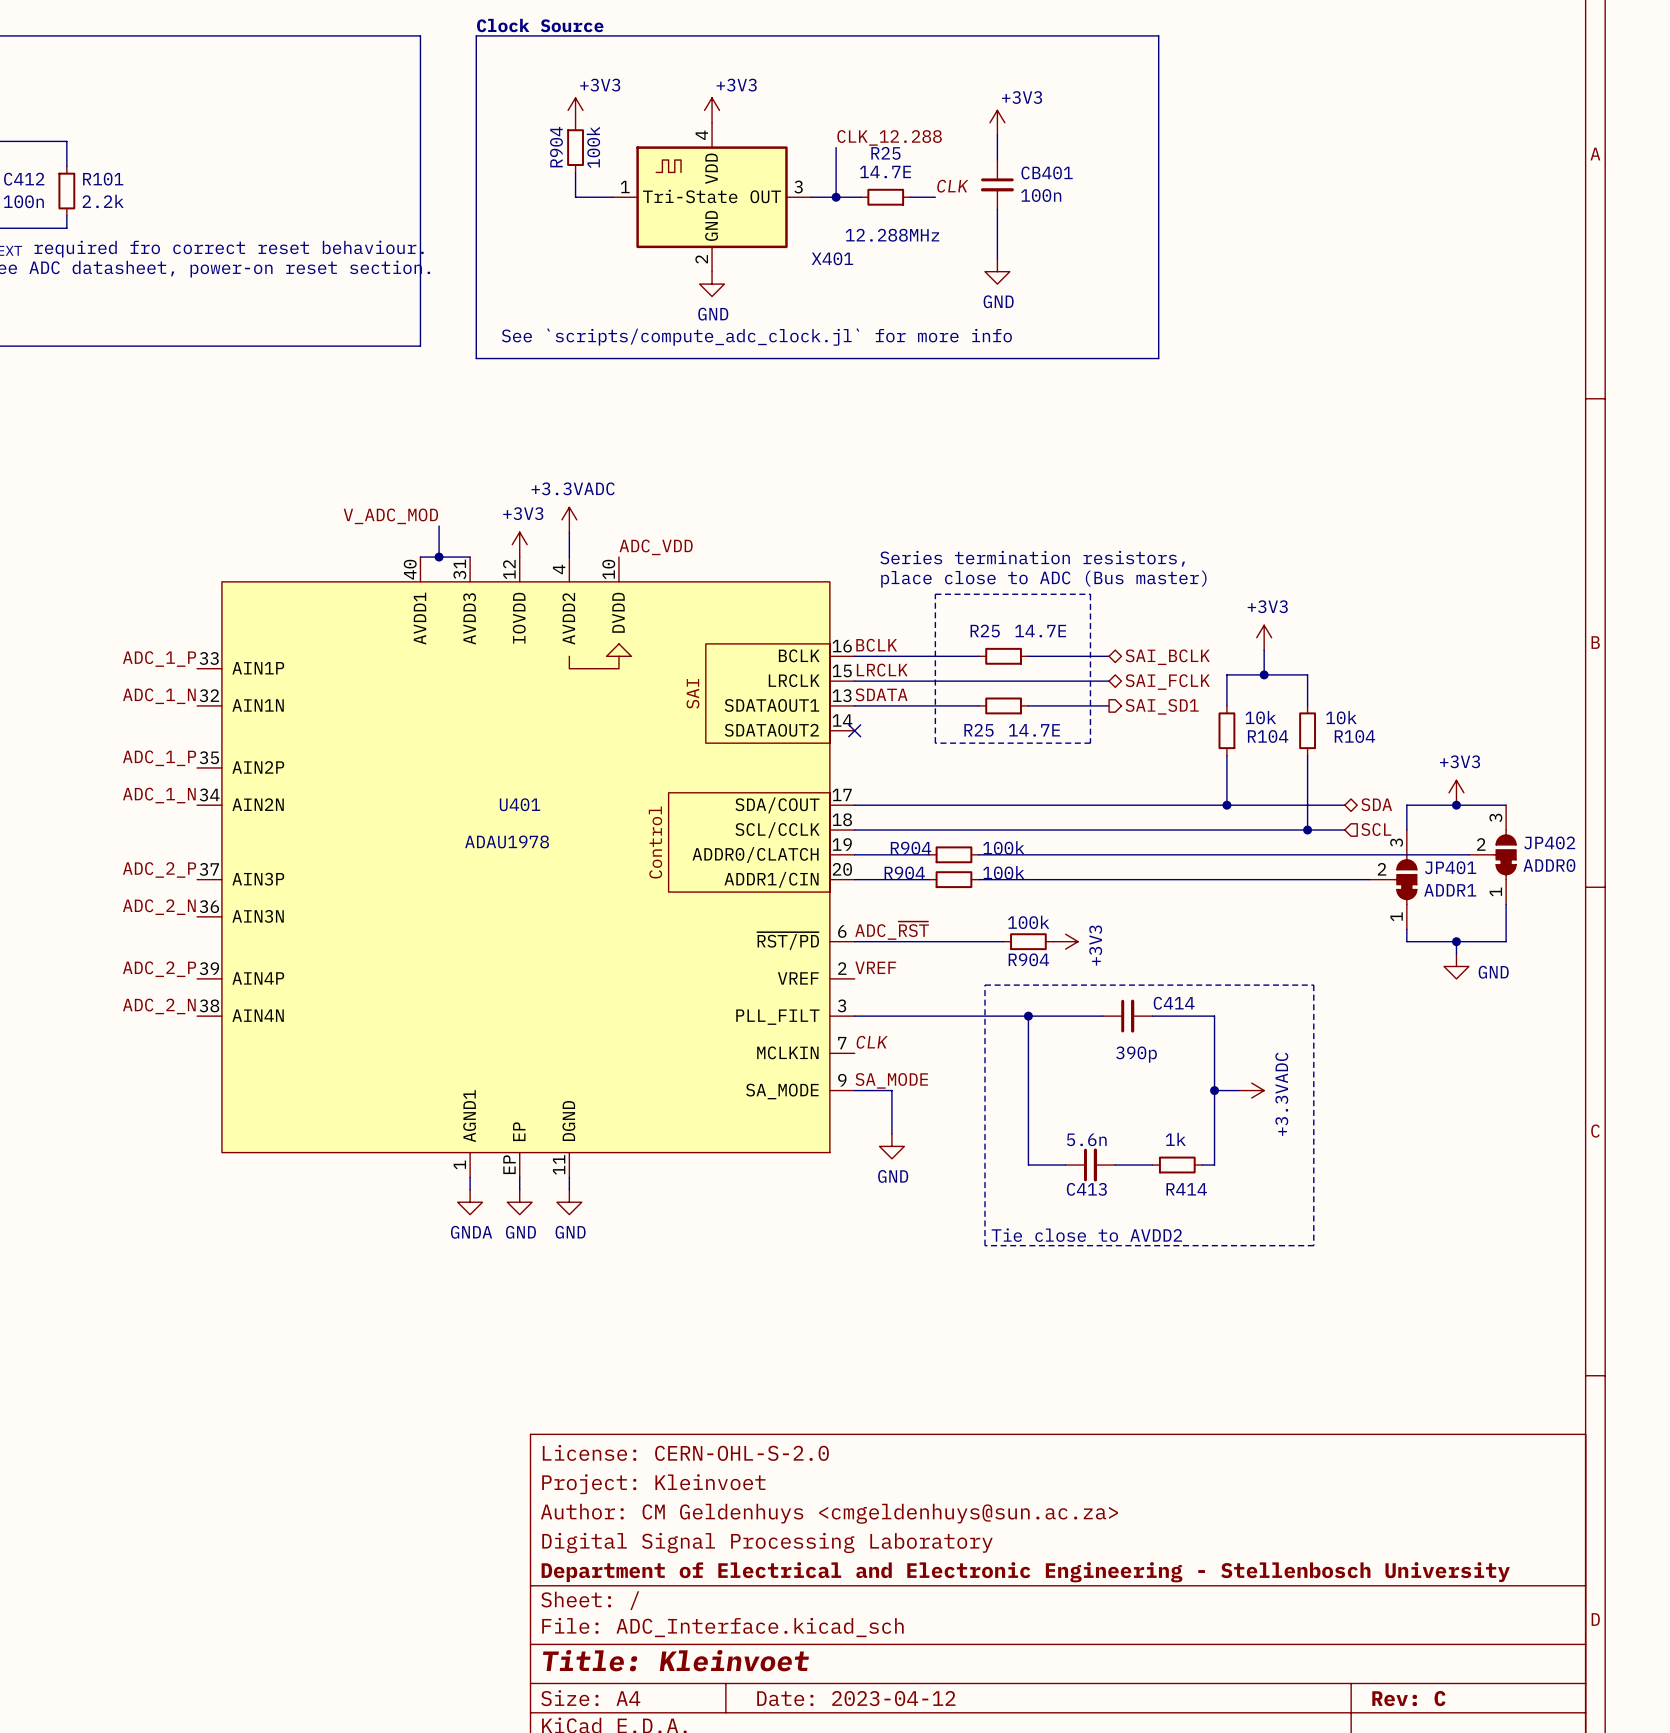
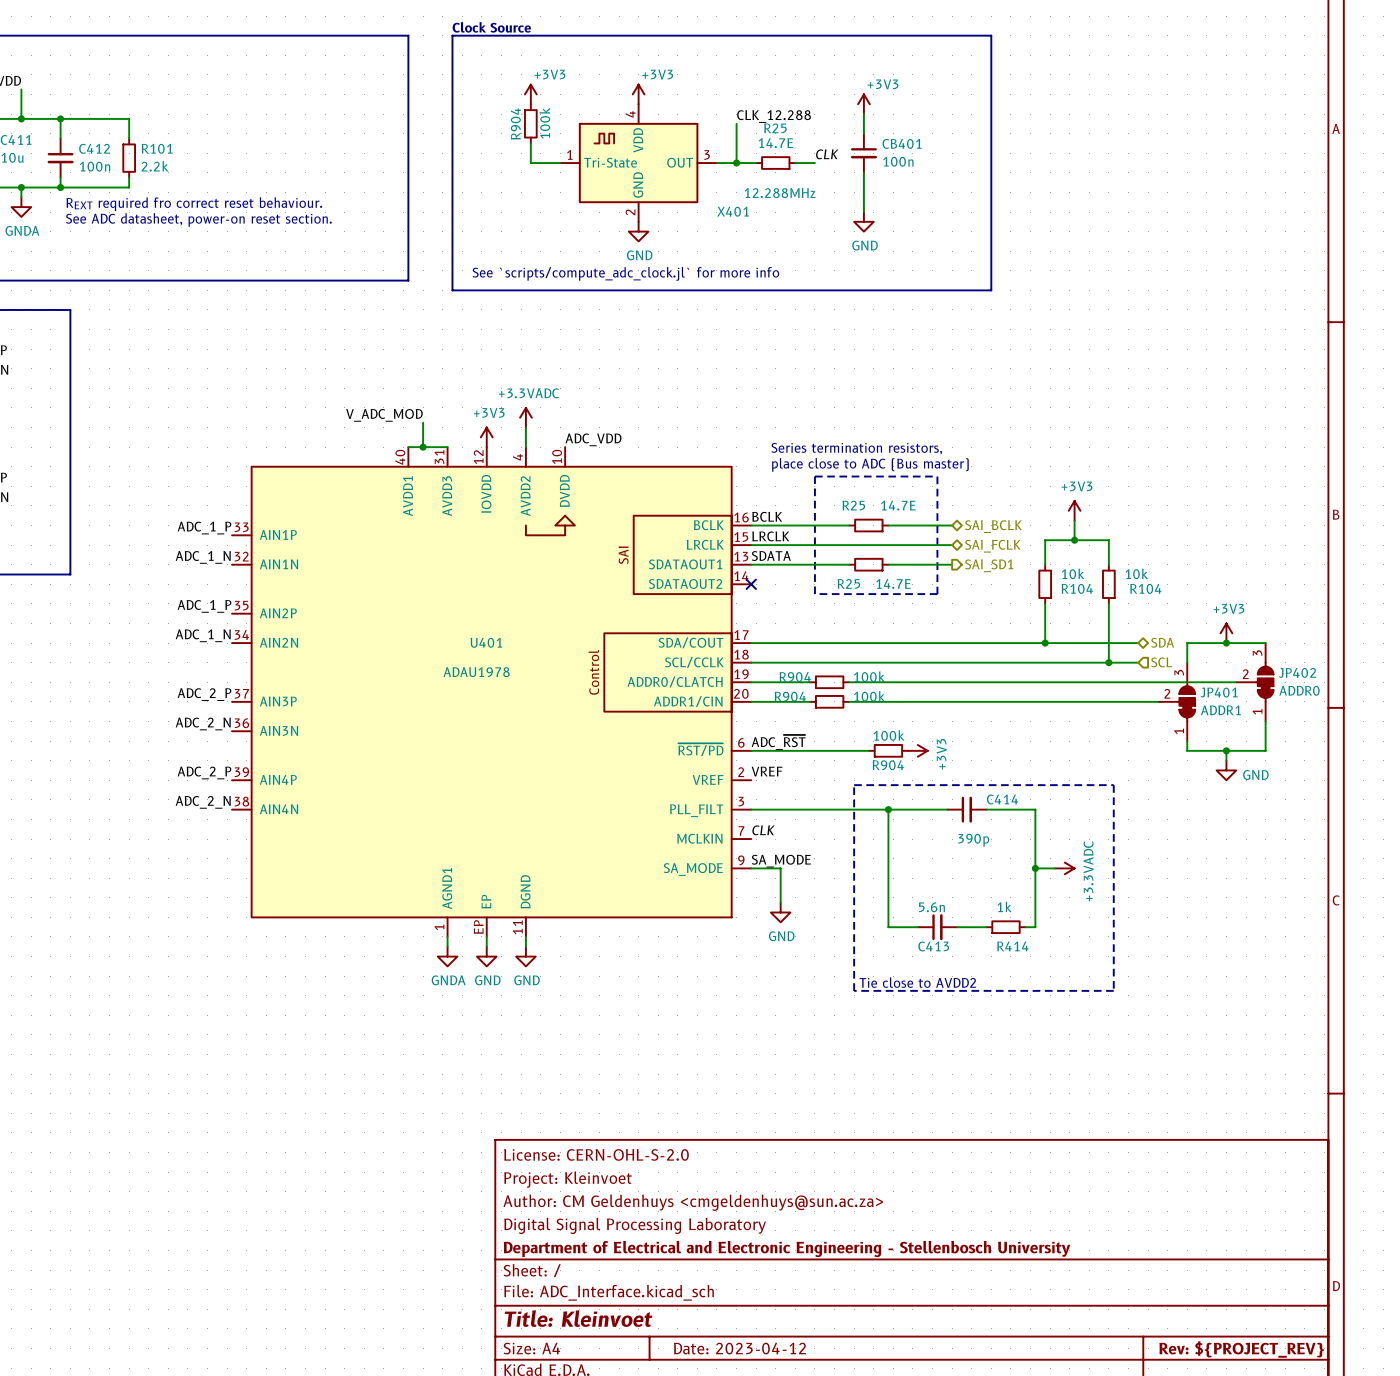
title block: Rev: C (1408, 1698) -> Rev: ${PROJECT_REV} (1241, 1349)

